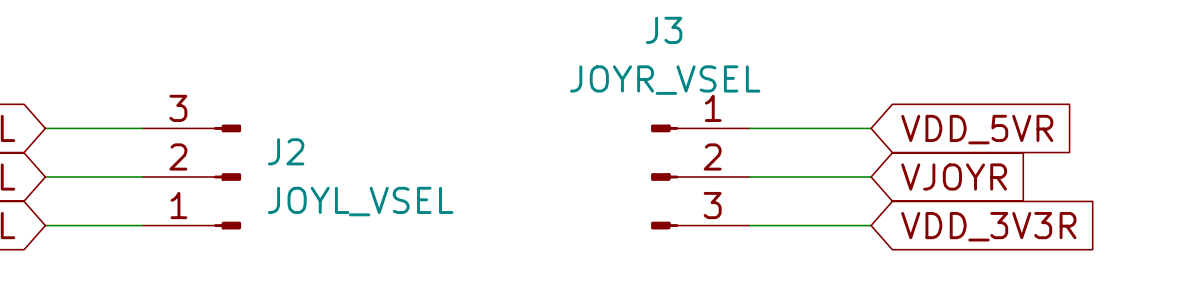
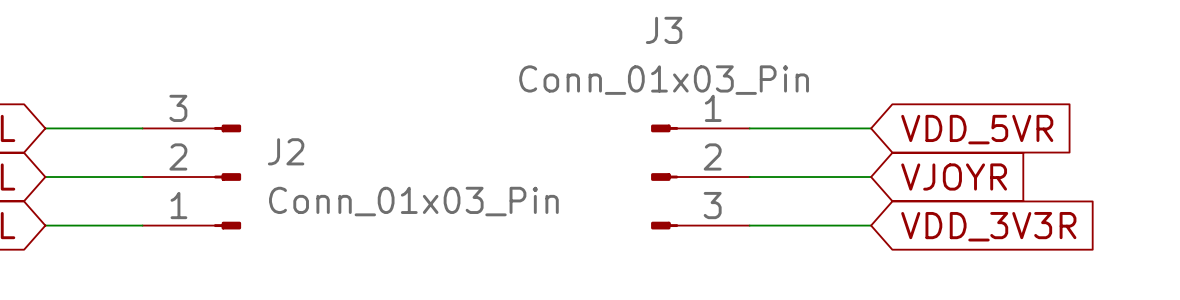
J3 value: JOYR_VSEL (665, 80) -> Conn_01x03_Pin (664, 80)
J2 value: JOYL_VSEL (360, 201) -> Conn_01x03_Pin (413, 201)

